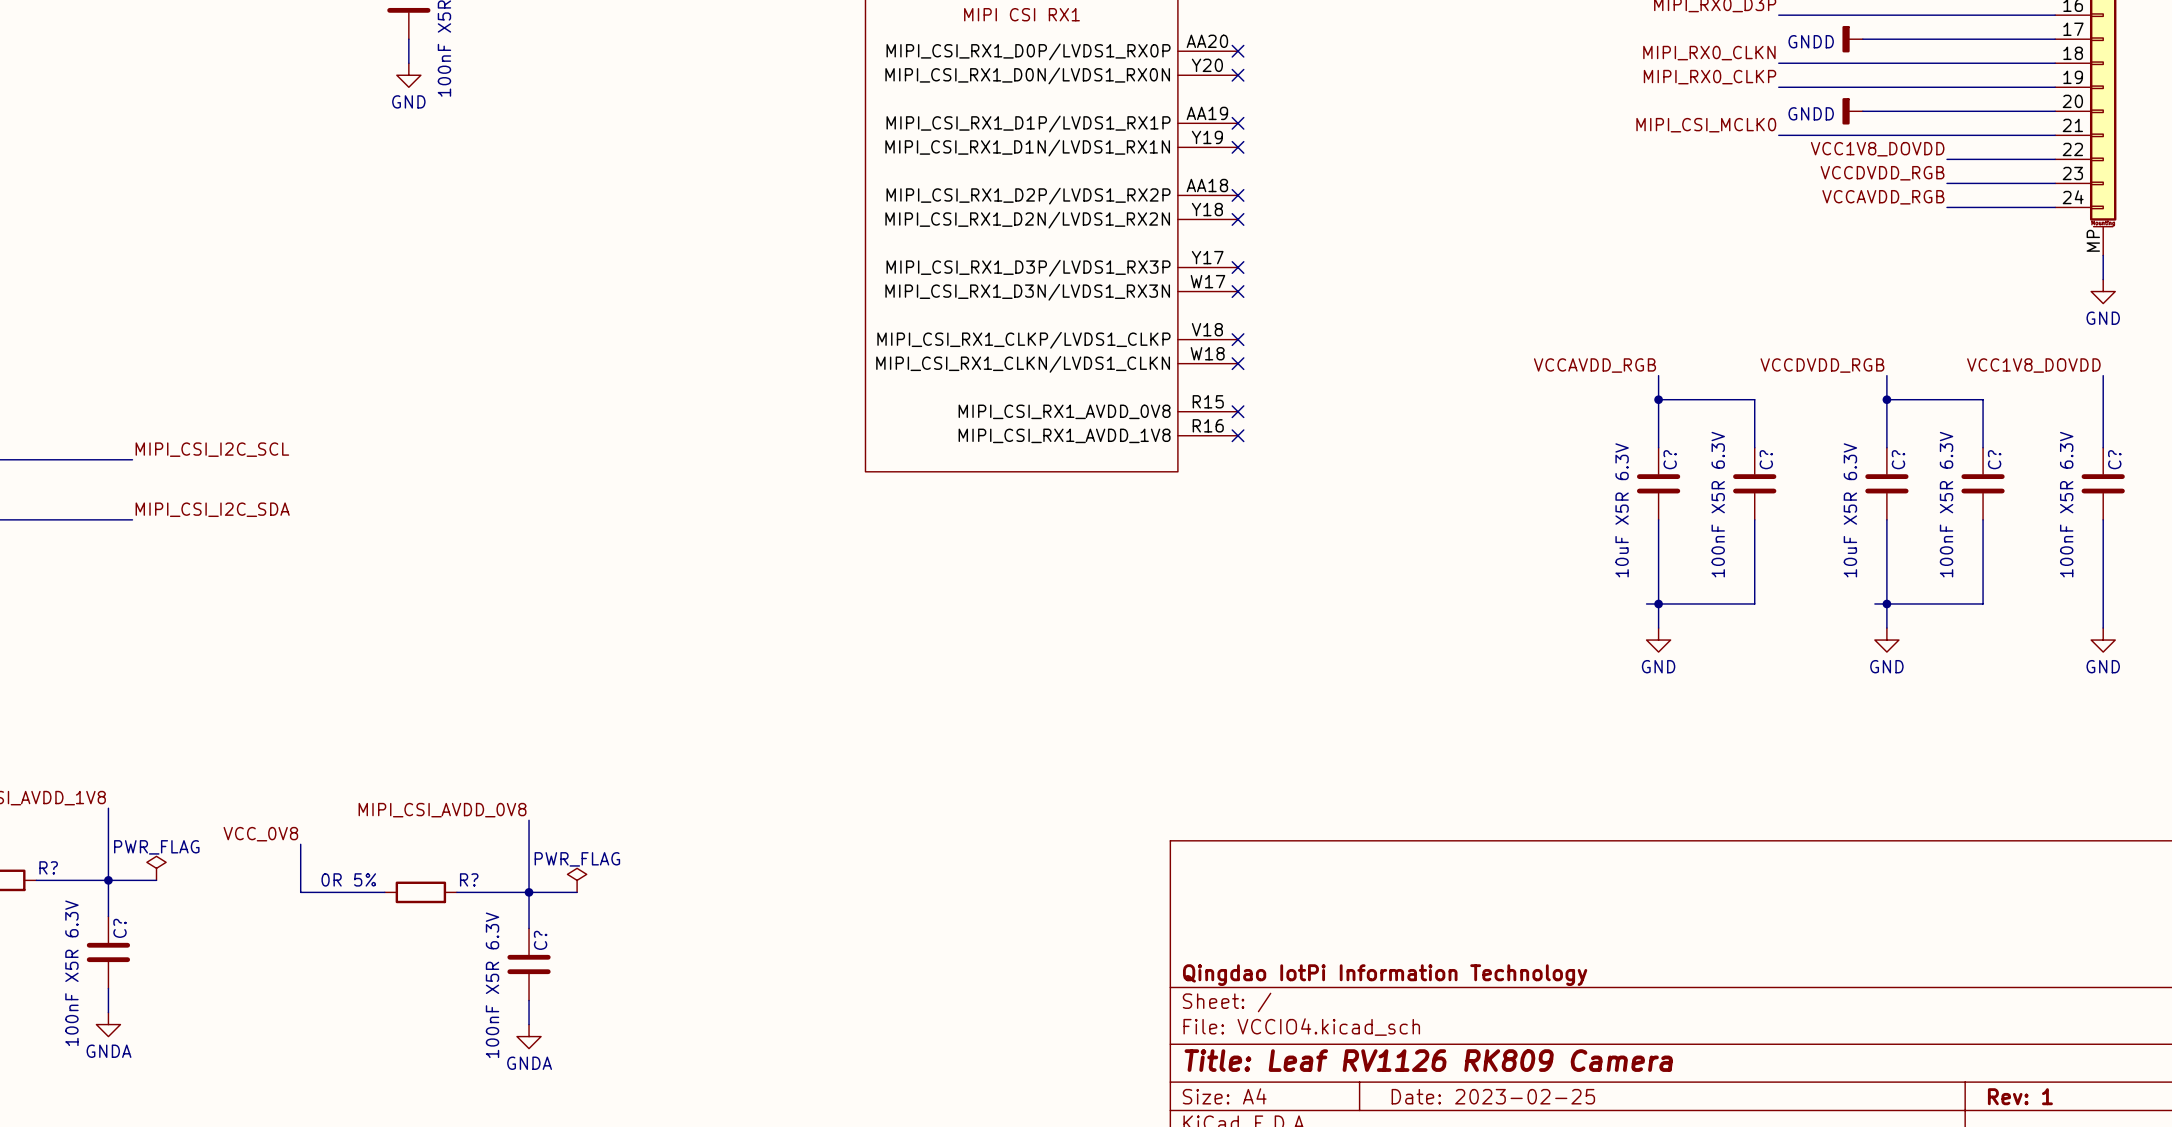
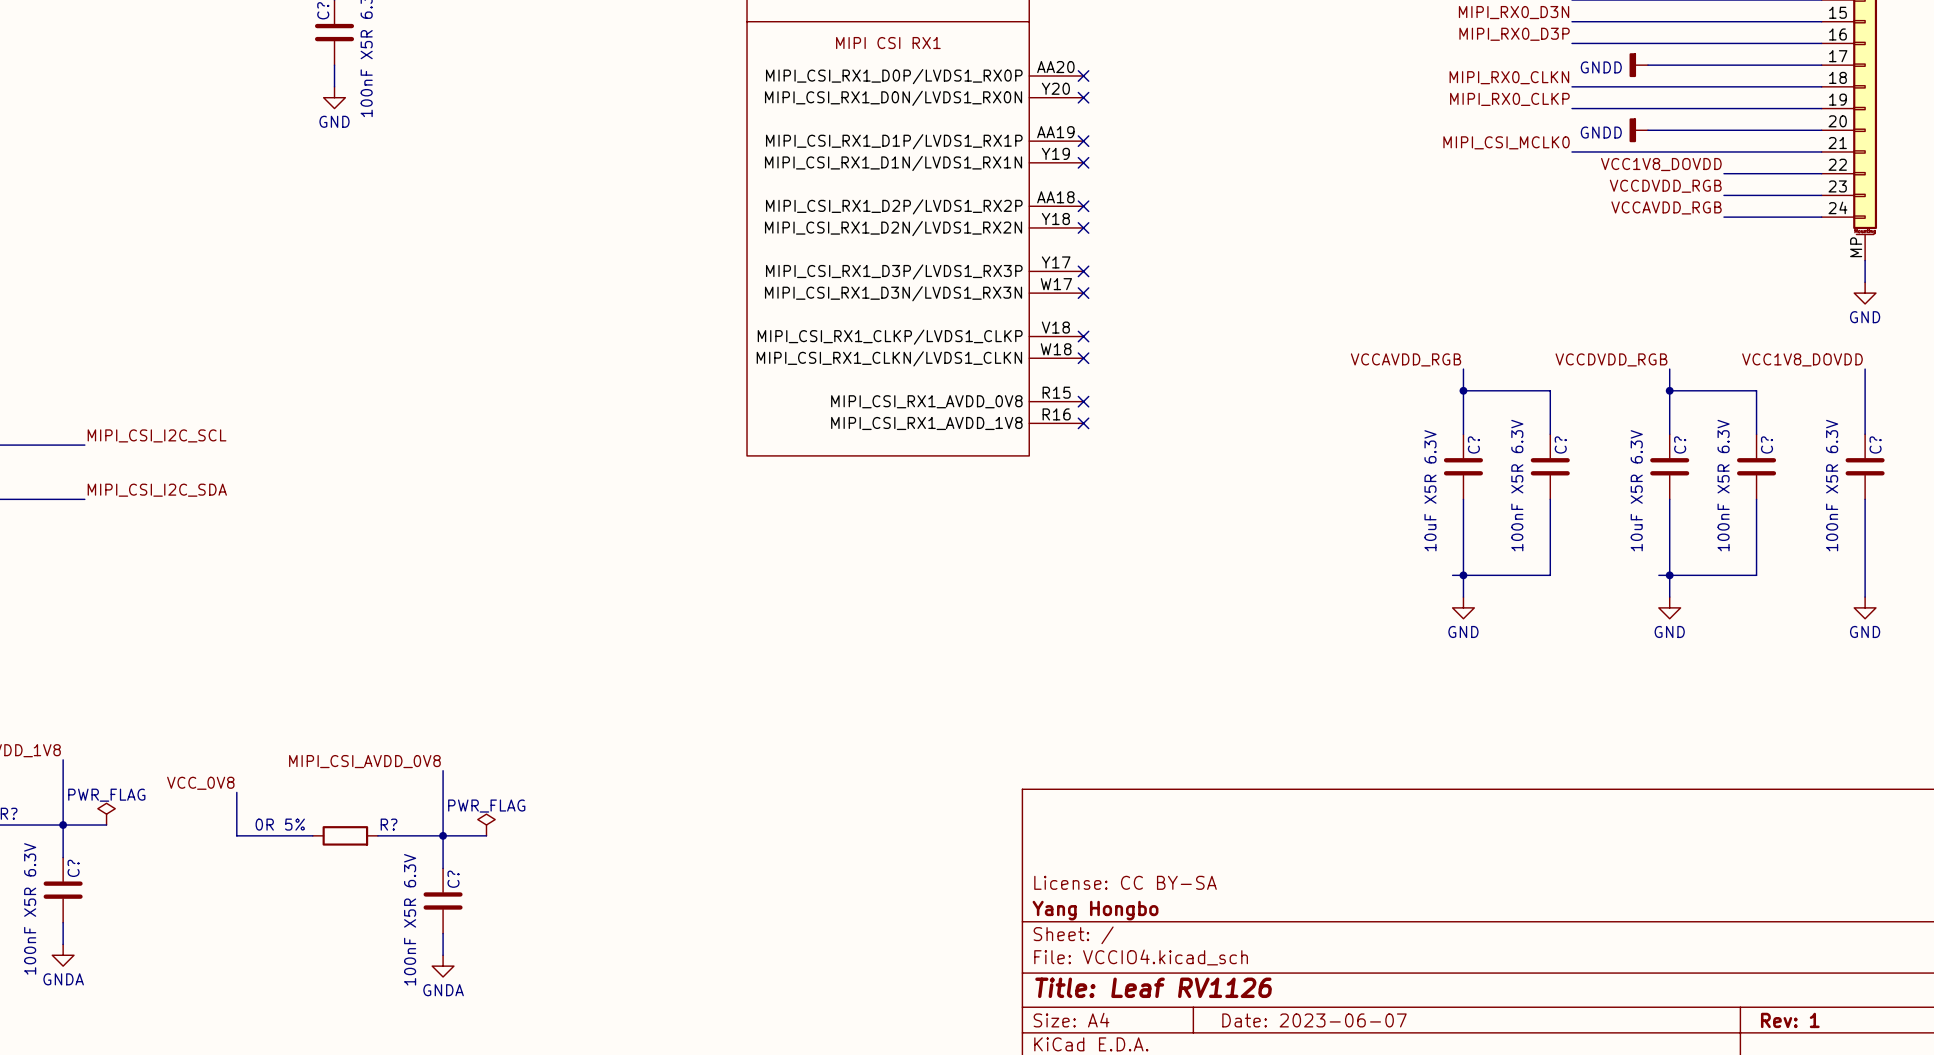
title block: none -> License: CC BY-SA (1125, 882)
title block: Qingdao IotPi Information Technology (1385, 975) -> Yang Hongbo (1095, 910)
title block: Title: Leaf RV1126 RK809 Camera (1428, 1060) -> Title: Leaf RV1126 (1153, 987)
title block: Date: 2023-02-25 (1493, 1096) -> Date: 2023-06-07 (1314, 1020)

